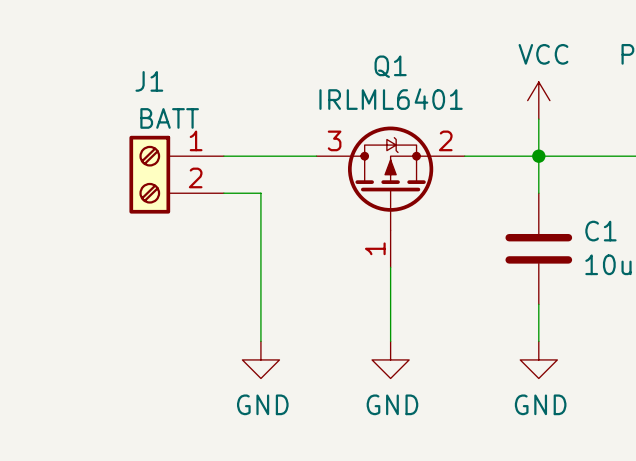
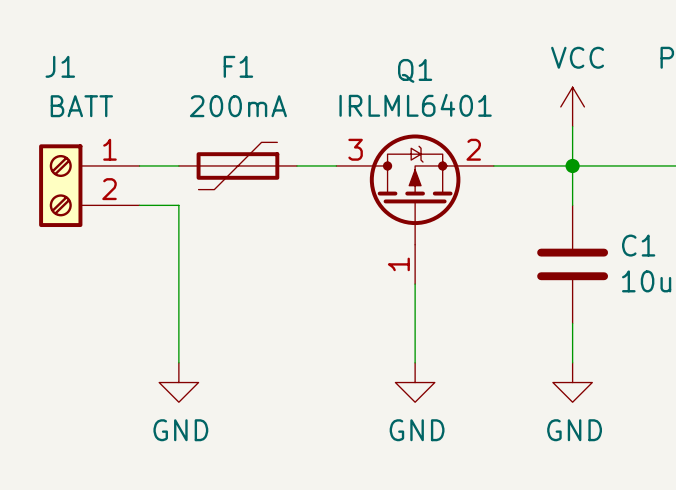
J1 name position: J1 (149, 81) -> J1 (60, 66)
J1 value position: BATT (169, 118) -> BATT (81, 106)
F1: none -> 200mA (237, 165)
J1 position: (176, 174) -> (89, 185)
wire: (223, 193) (260, 193) (260, 341) -> (139, 205) (178, 205) (178, 362)
power symbol position: GND (260, 359) -> GND (178, 382)

